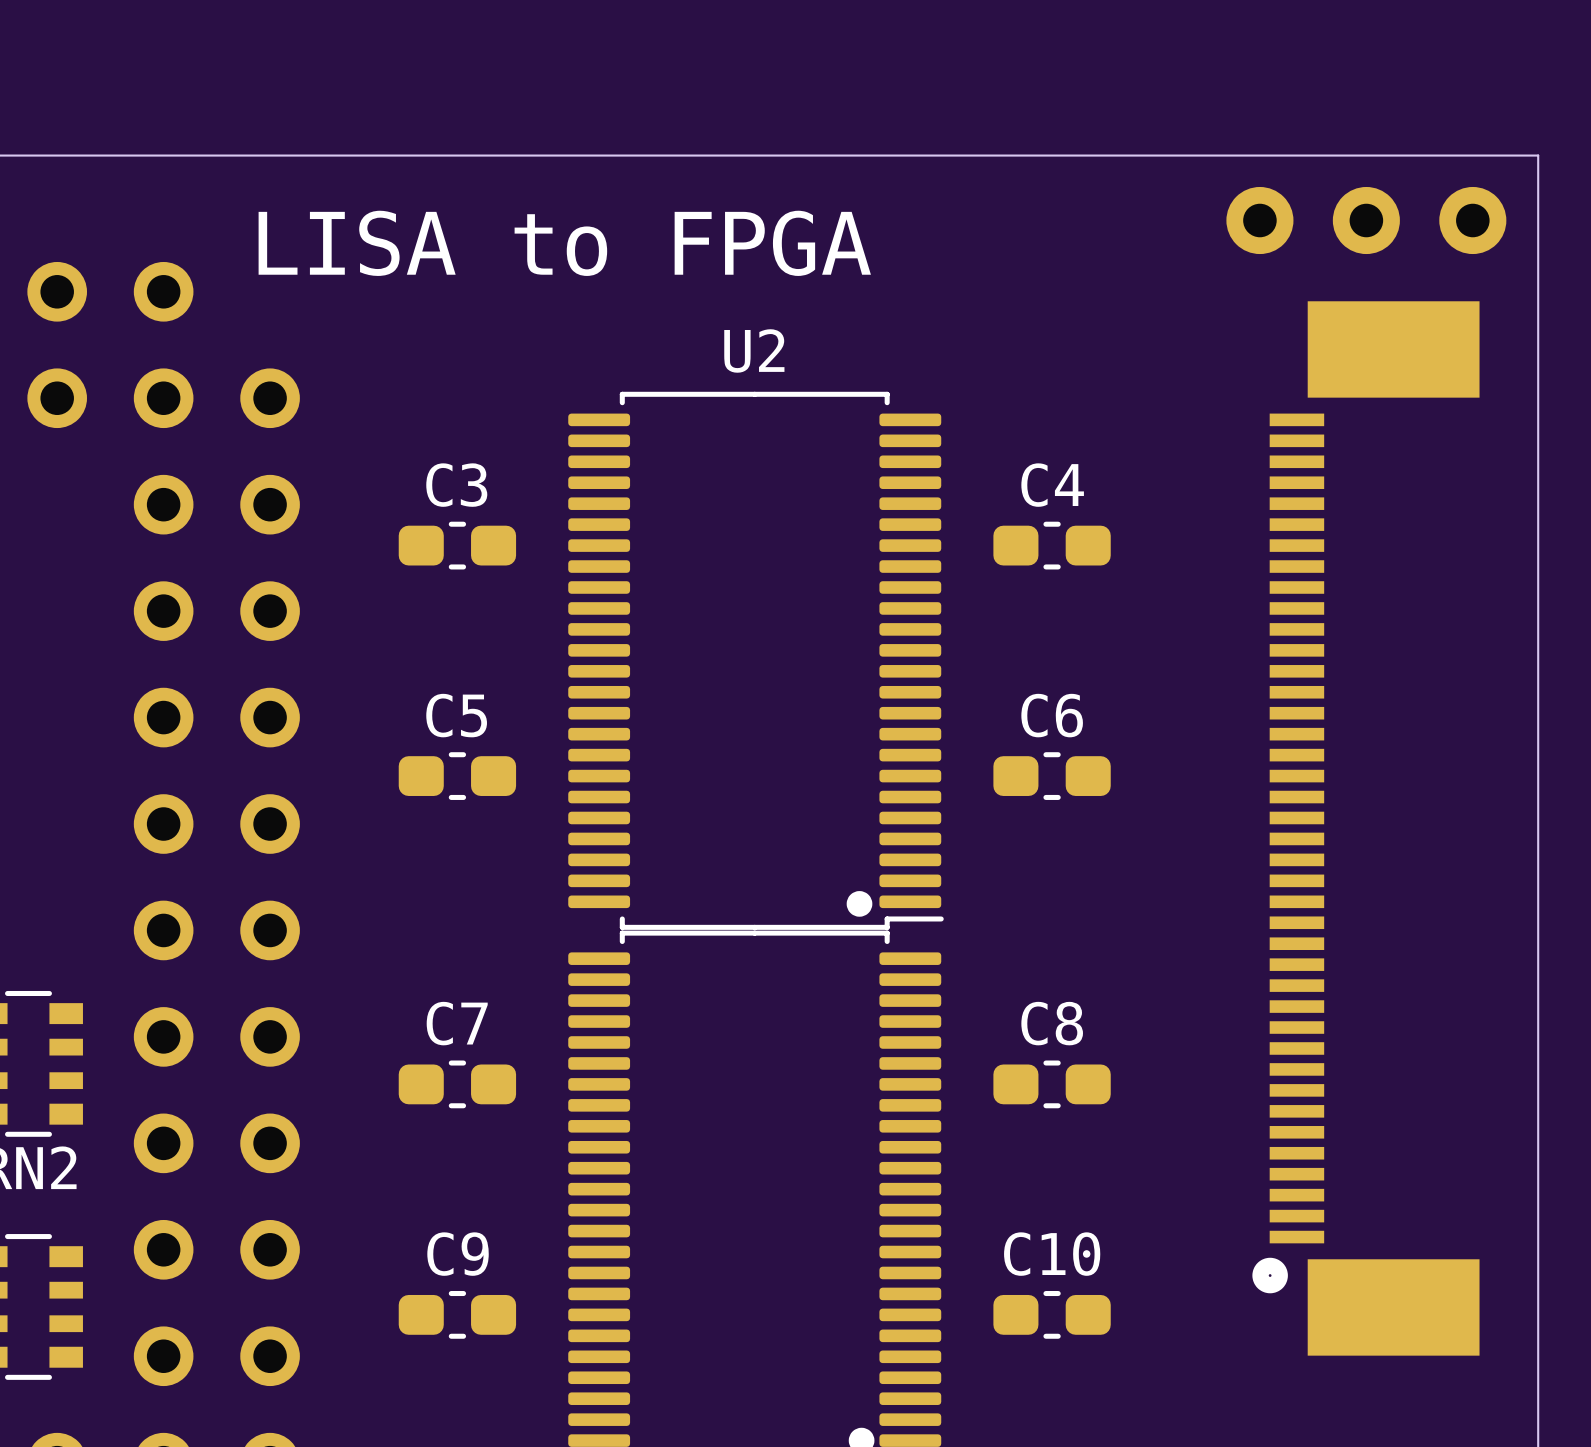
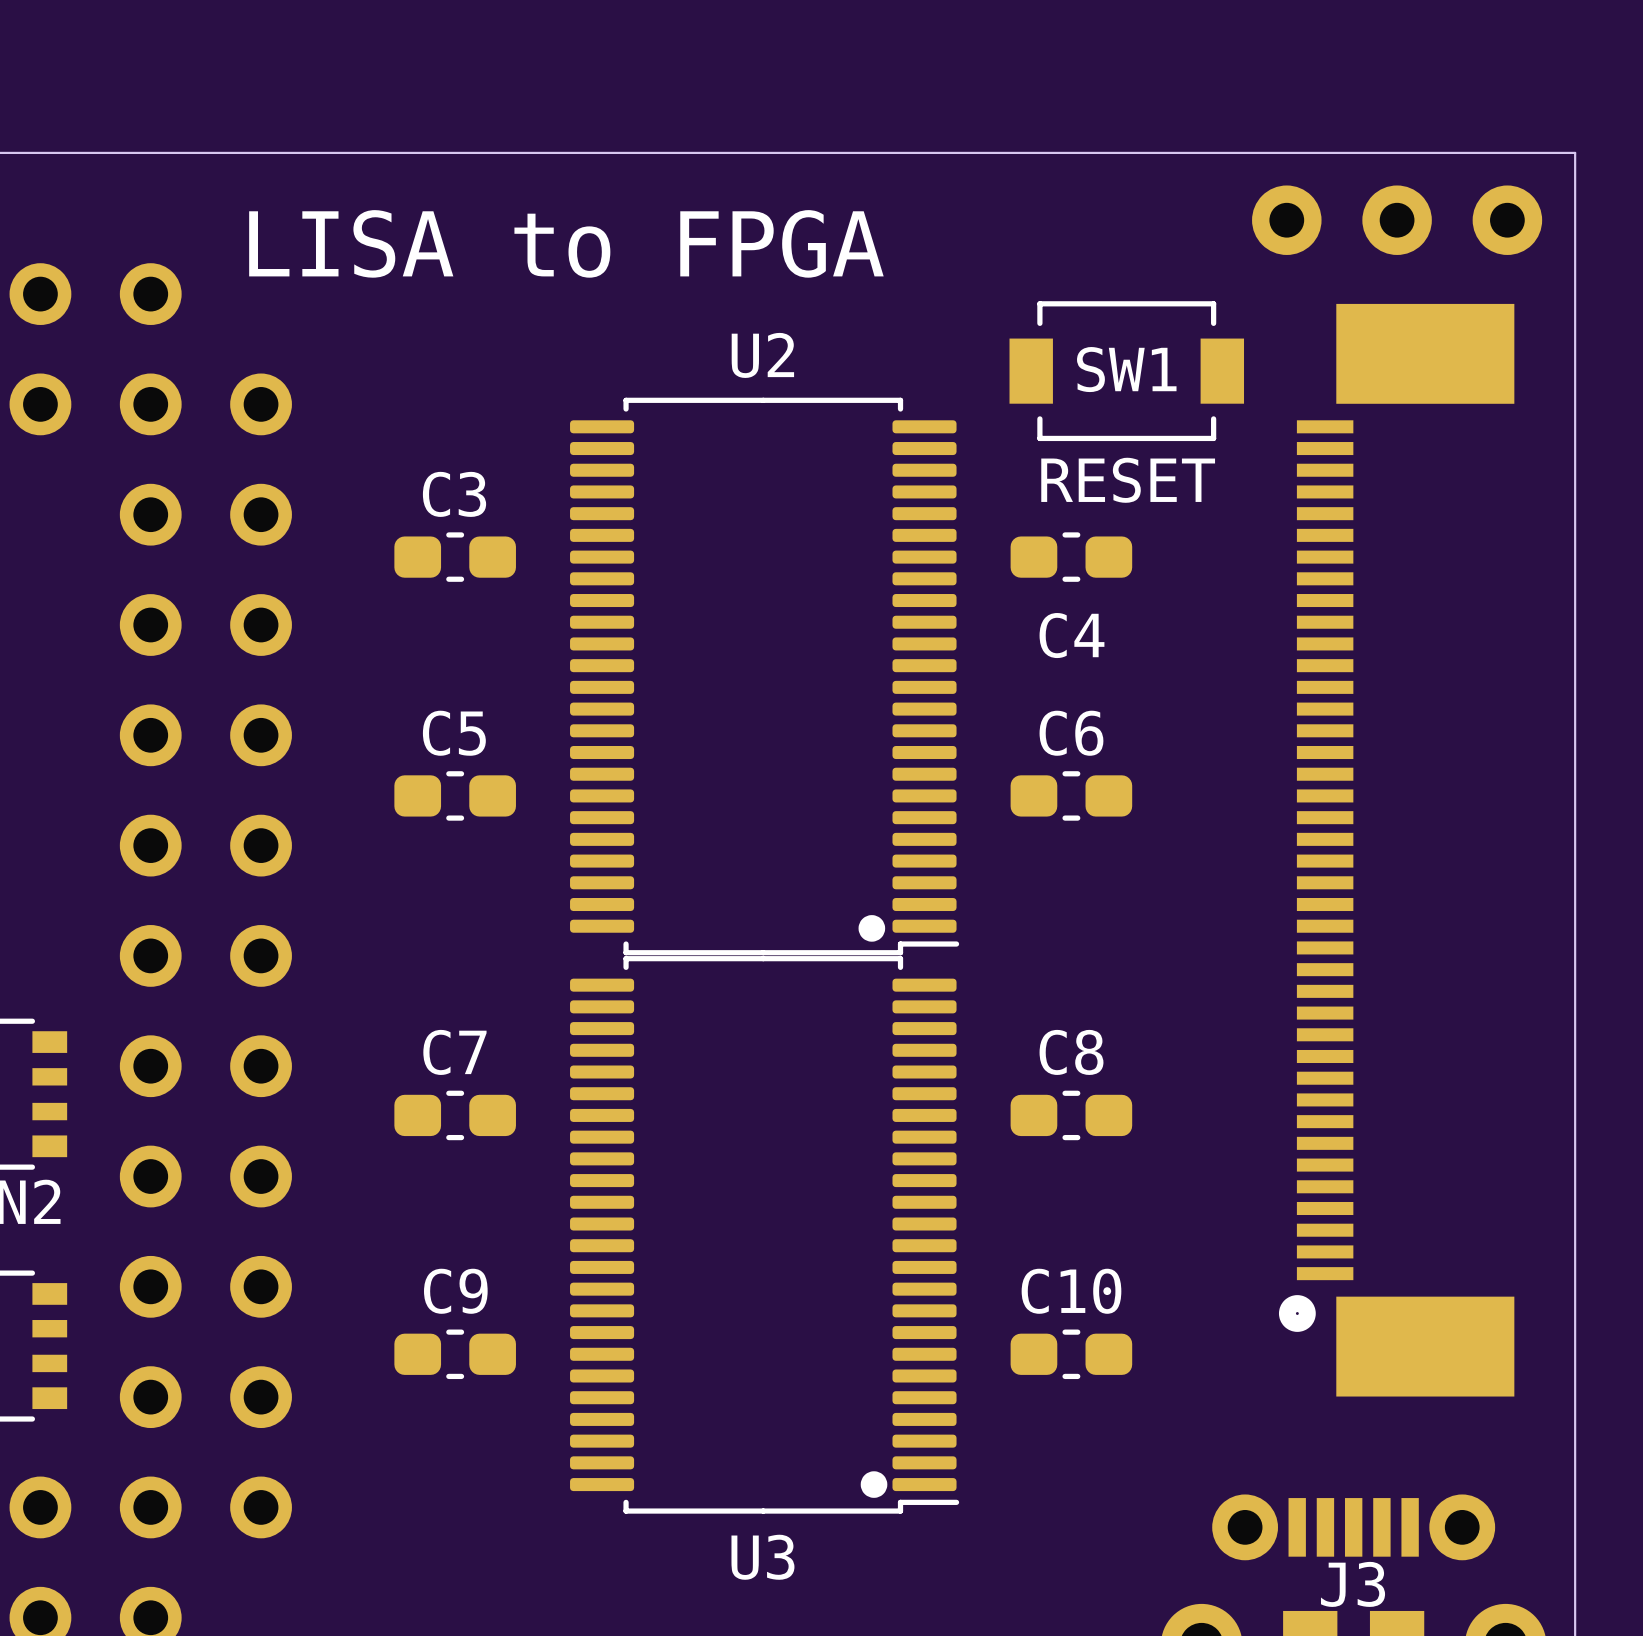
SW1: none -> (1126, 371)
text: none -> RESET (1128, 480)
C4 name position: C4 (1052, 485) -> C4 (1071, 635)

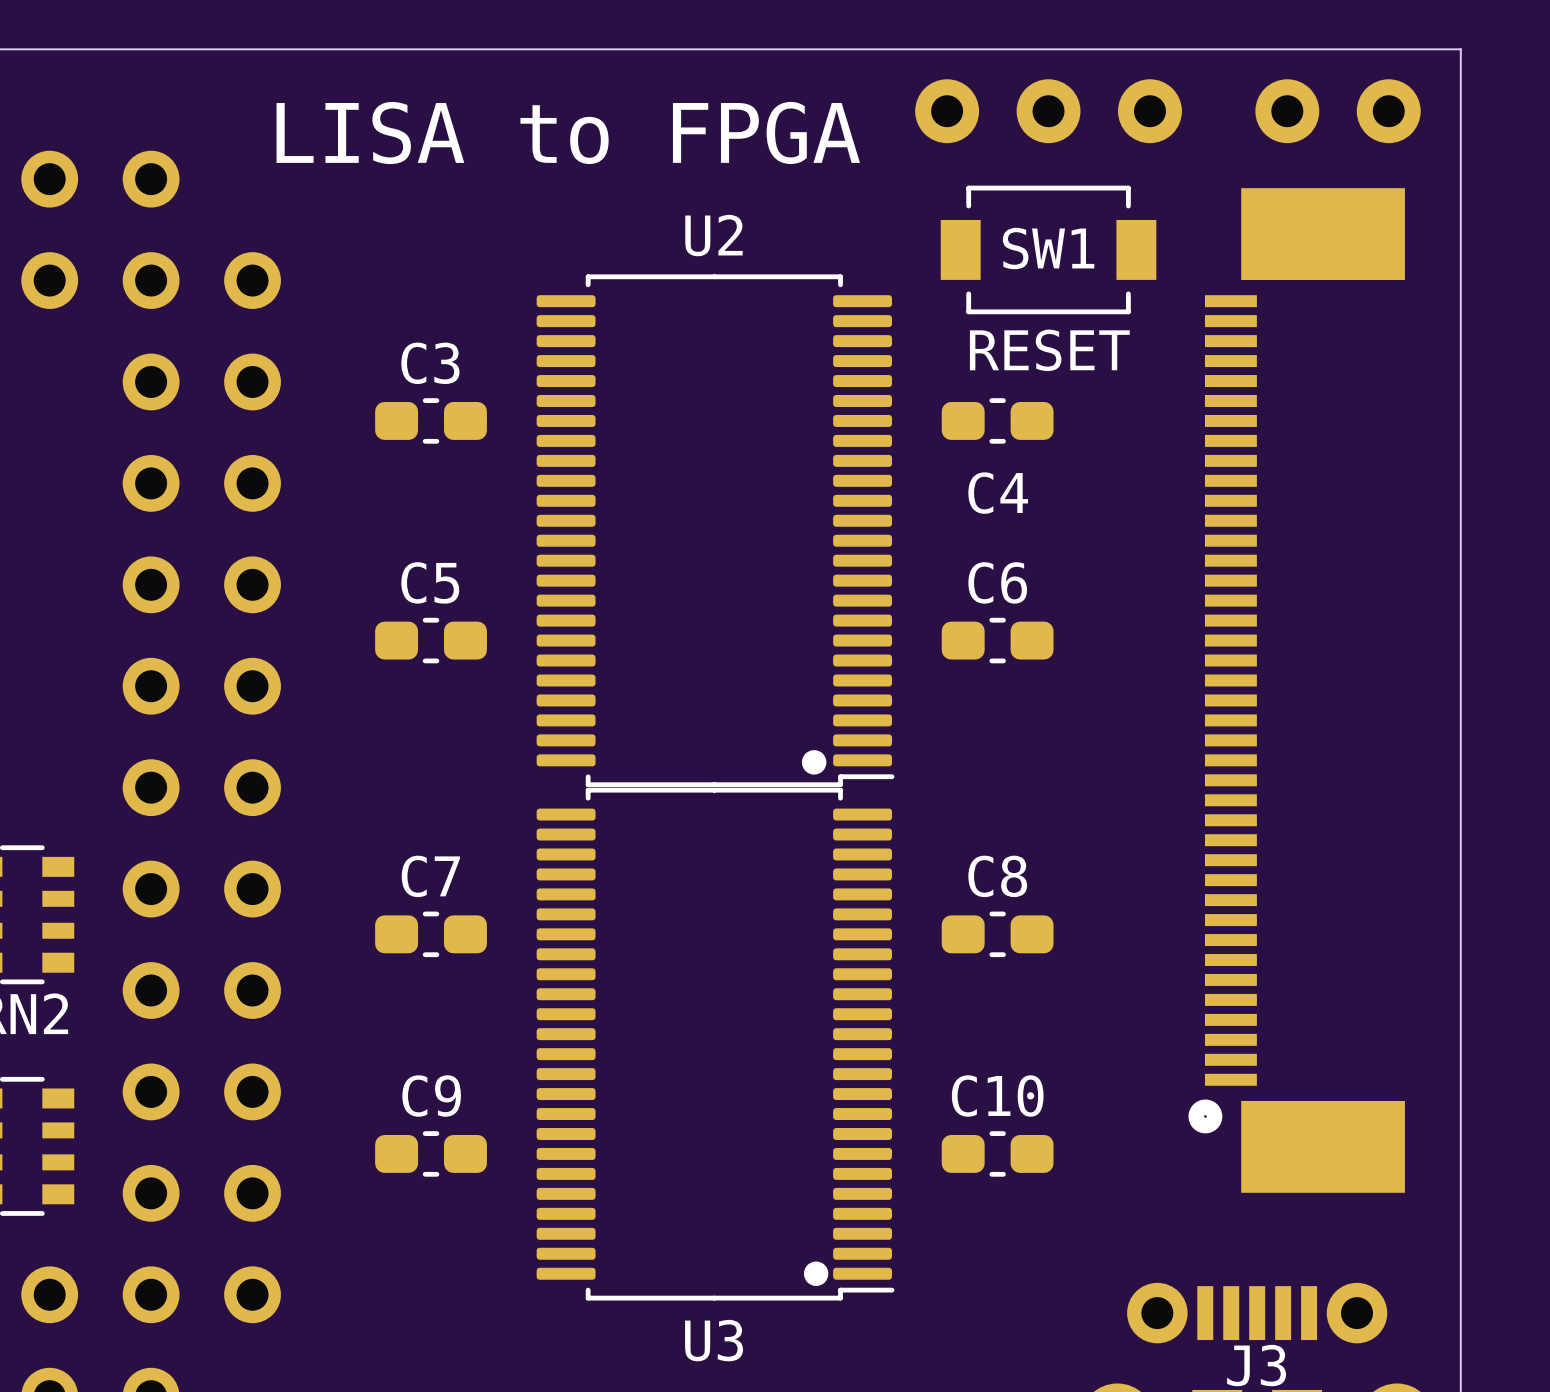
part position: (1397, 220) -> (1048, 111)
part: none -> (1338, 111)
text position: LISA to FPGA (566, 243) -> LISA to FPGA (568, 132)

